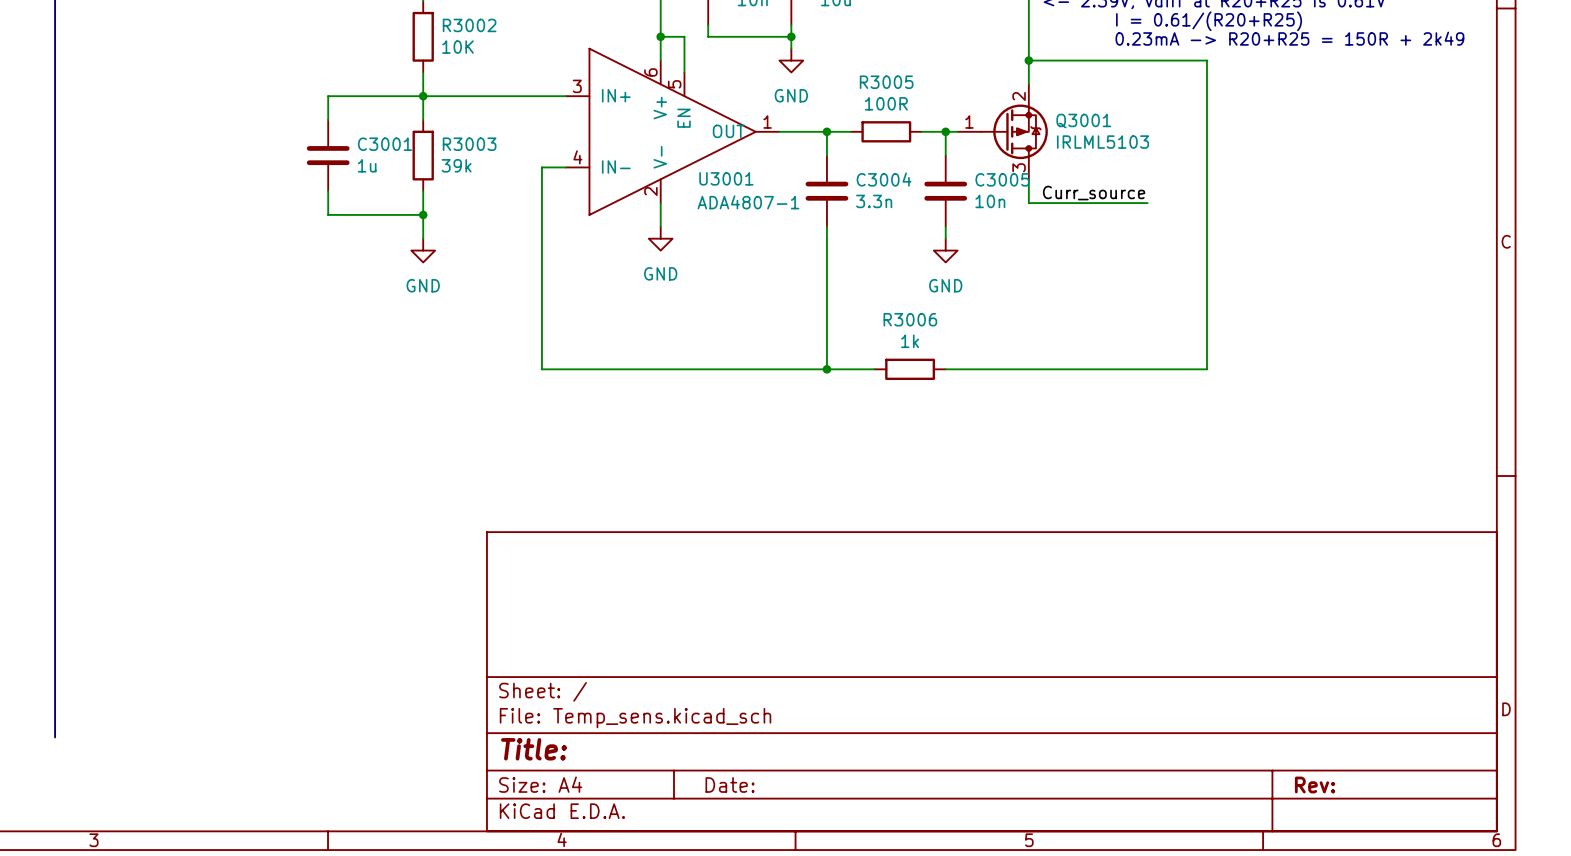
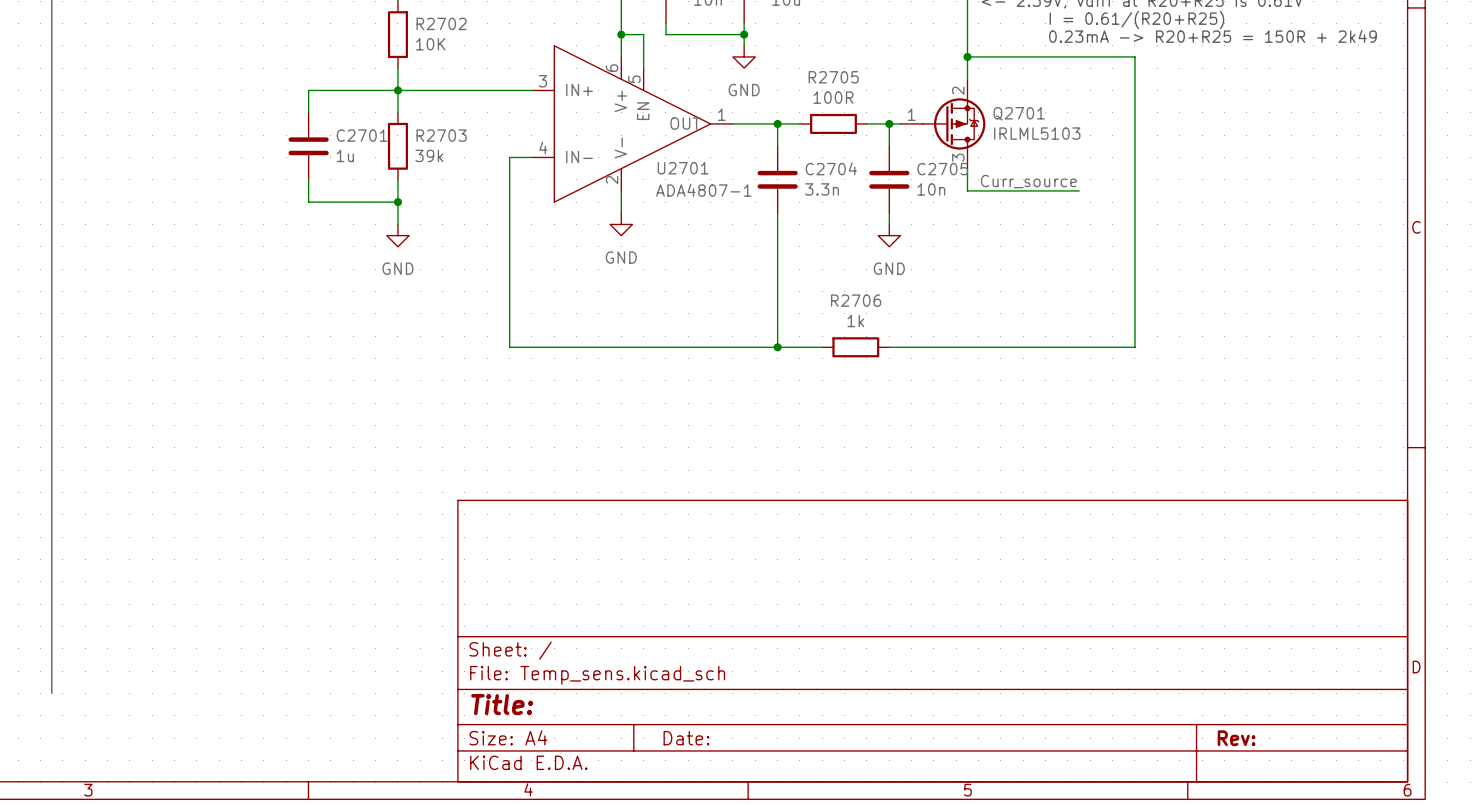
R3002 name: R3002 (469, 25) -> R2702 (441, 23)
R3005 name: R3005 (886, 82) -> R2705 (833, 77)
Q3001 name: Q3001 (1083, 121) -> Q2701 (1019, 113)
C3001 name: C3001 (385, 144) -> C2701 (362, 135)
R3003 name: R3003 (469, 144) -> R2703 (441, 135)
U3001 name: U3001 (726, 178) -> U2701 (683, 168)
C3004 name: C3004 (884, 179) -> C2704 (831, 168)
C3005 name: C3005 (1002, 179) -> C2705 (942, 169)
R3006 name: R3006 (910, 319) -> R2706 (856, 300)

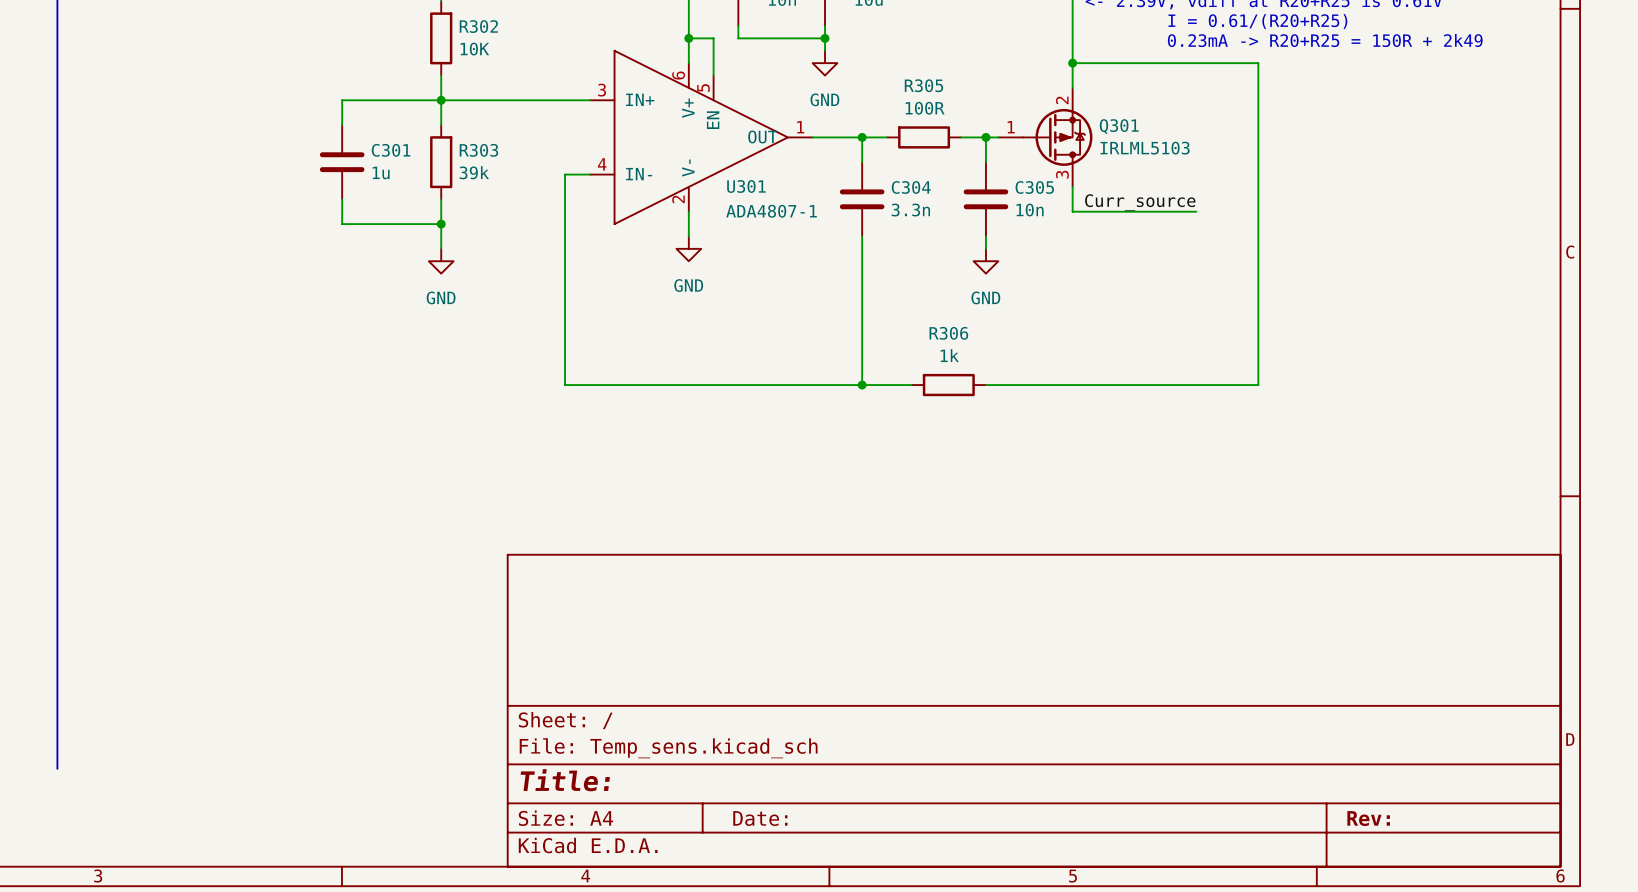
R2702 name: R2702 (441, 23) -> R302 (478, 26)
R2705 name: R2705 (833, 77) -> R305 (923, 85)
Q2701 name: Q2701 (1019, 113) -> Q301 (1119, 126)
C2701 name: C2701 (362, 135) -> C301 (391, 150)
R2703 name: R2703 (441, 135) -> R303 (478, 150)
U2701 name: U2701 (683, 168) -> U301 (746, 186)
C2704 name: C2704 (831, 168) -> C304 (911, 187)
C2705 name: C2705 (942, 169) -> C305 (1034, 187)
R2706 name: R2706 (856, 300) -> R306 (948, 333)

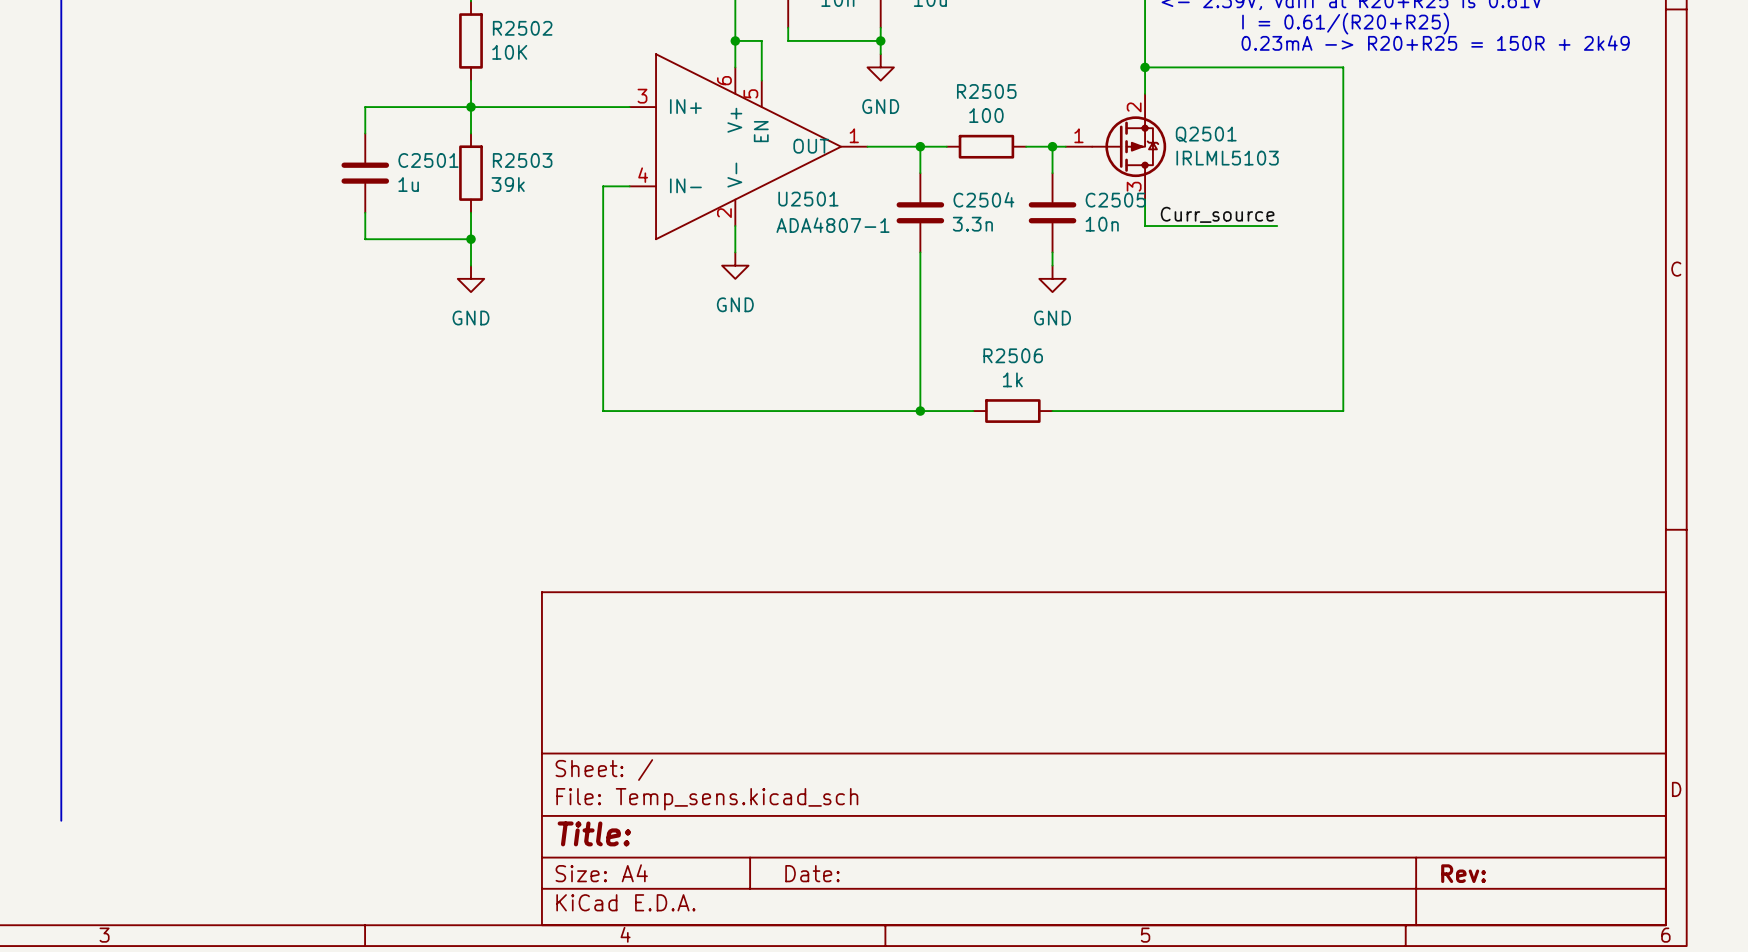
R302 name: R302 (478, 26) -> R2502 (522, 28)
R305 name: R305 (923, 85) -> R2505 (986, 91)
R305 value: 100R (925, 108) -> 100 (986, 115)
Q301 name: Q301 (1119, 126) -> Q2501 (1206, 134)
C301 name: C301 (391, 150) -> C2501 (428, 160)
R303 name: R303 (478, 150) -> R2503 (522, 160)
U301 name: U301 (746, 186) -> U2501 (808, 199)
C304 name: C304 (911, 187) -> C2504 (983, 199)
C305 name: C305 (1034, 187) -> C2505 (1115, 200)
R306 name: R306 (948, 333) -> R2506 (1013, 355)

